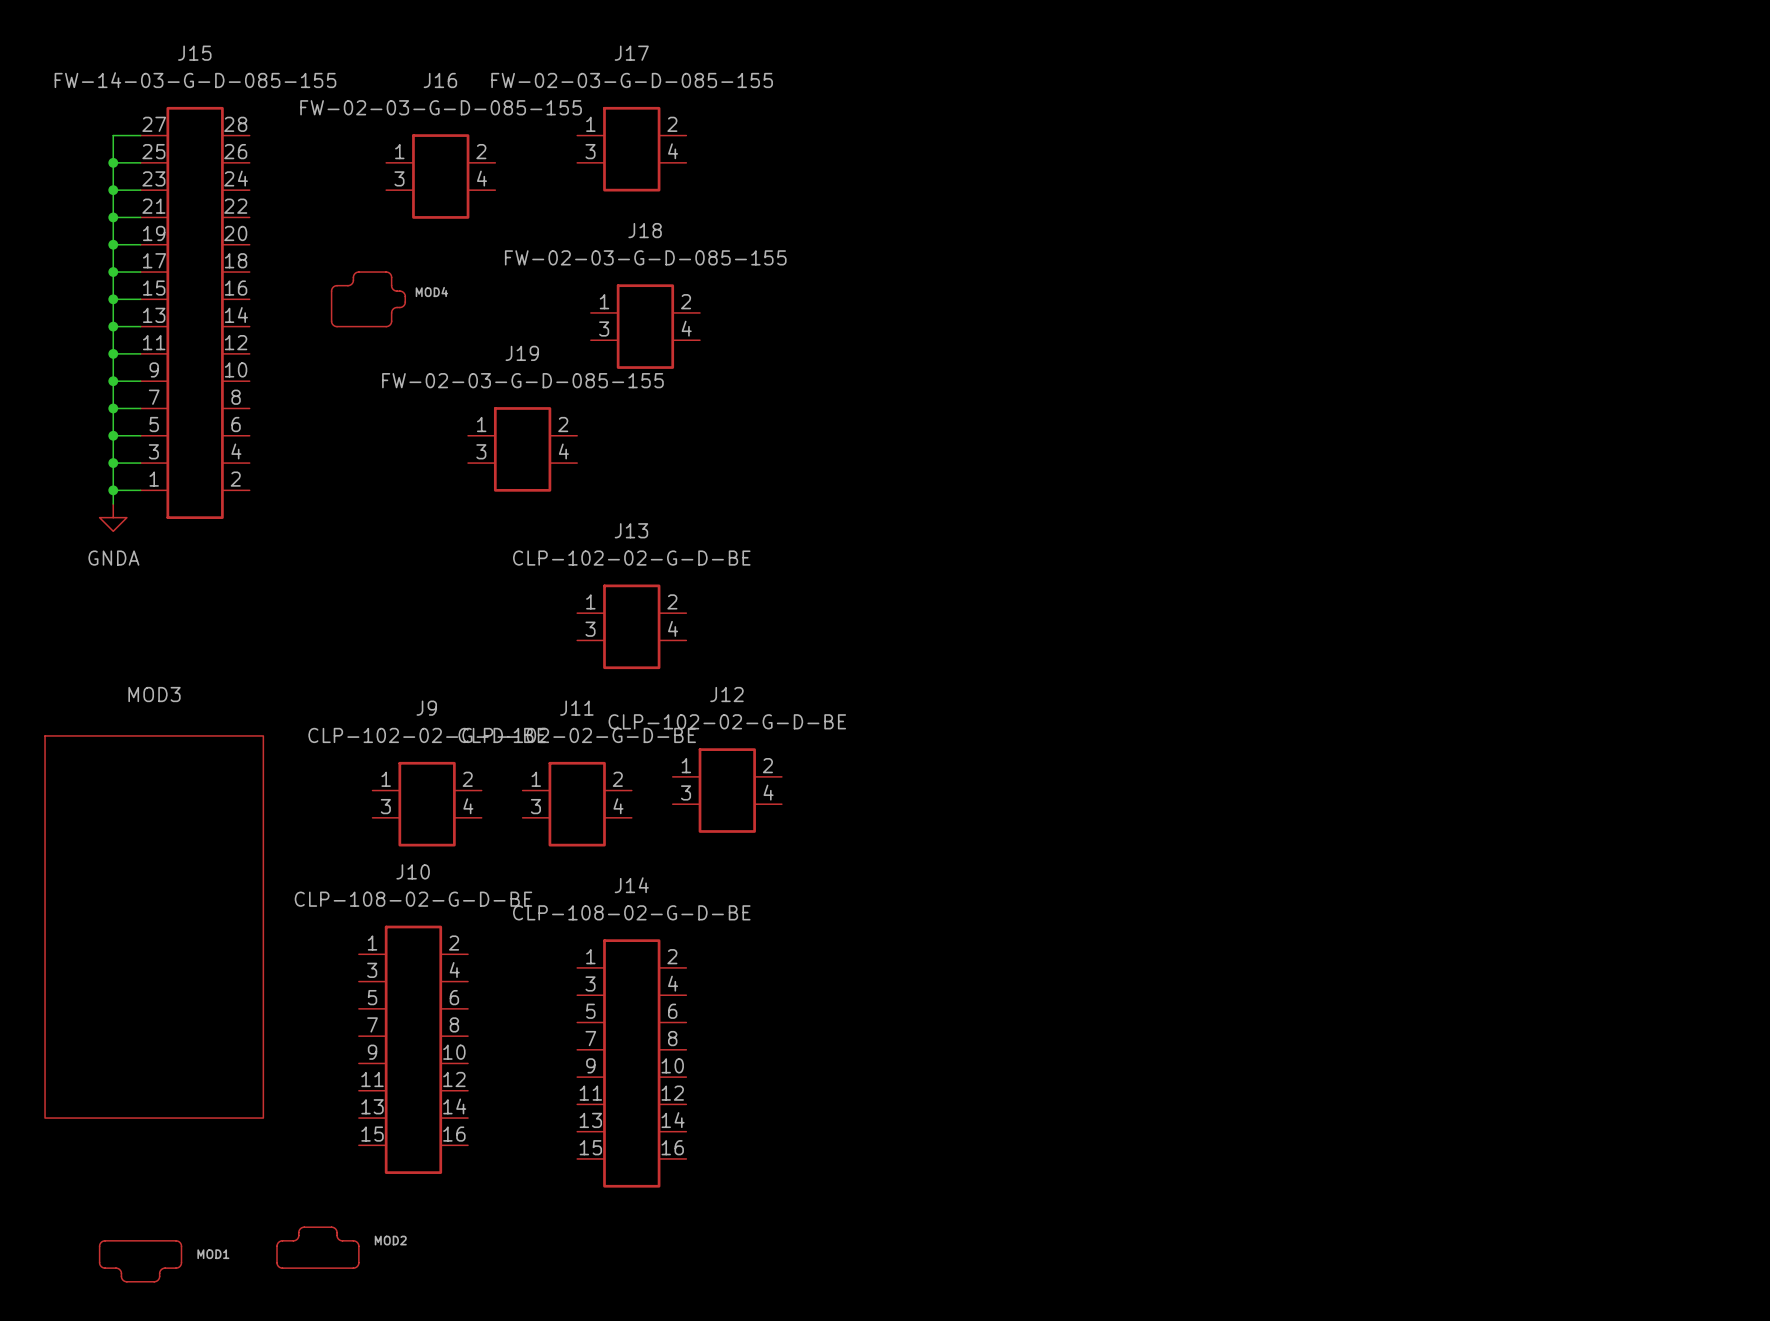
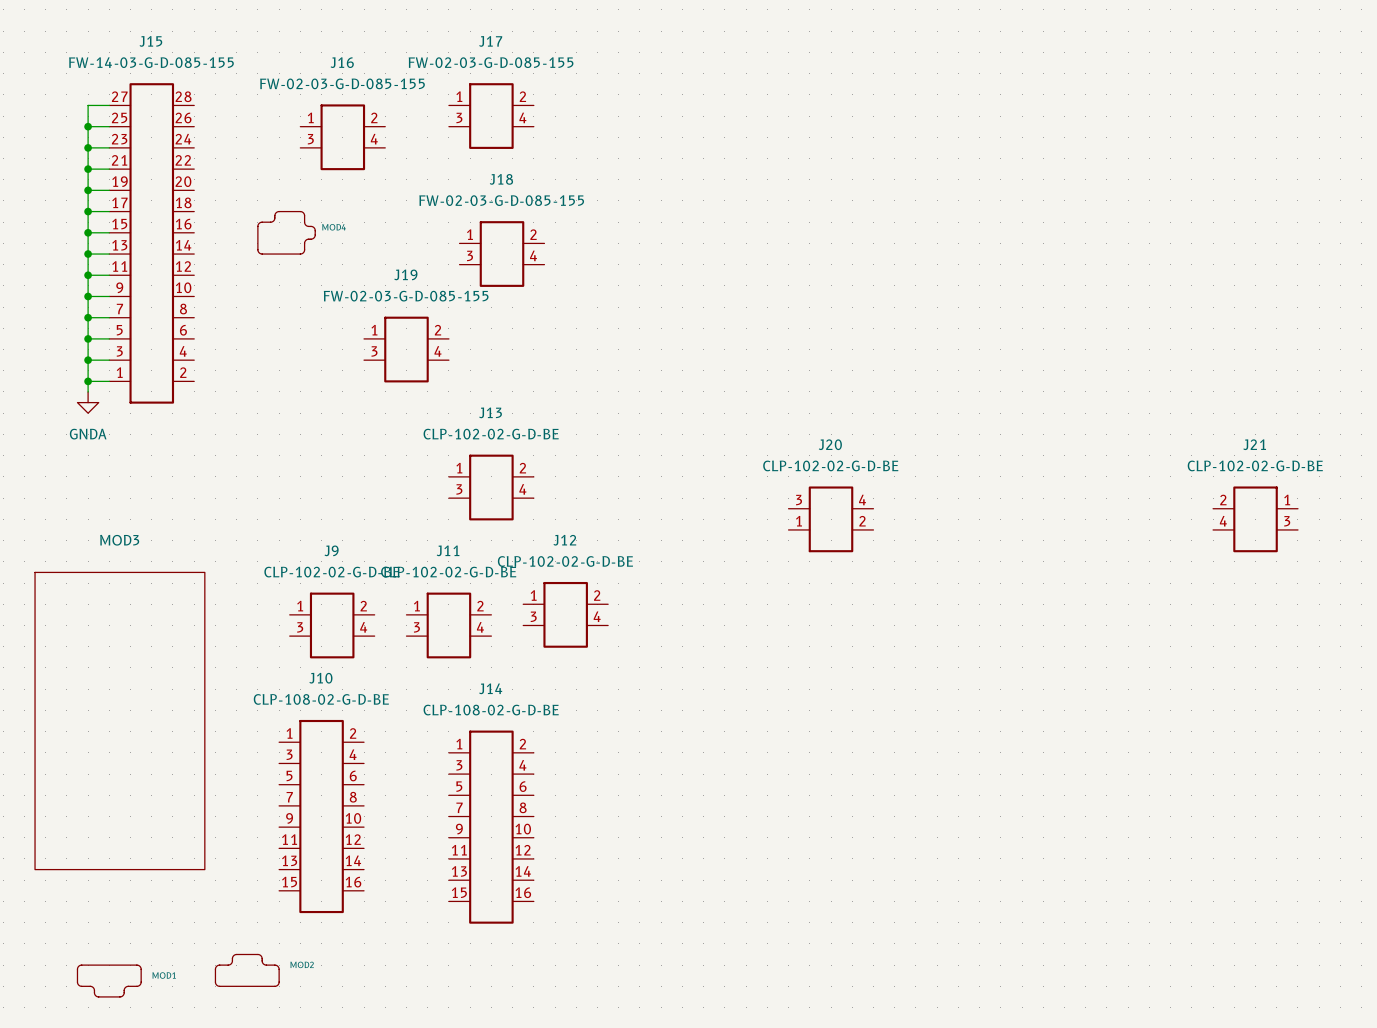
J20: none -> CLP-102-02-G-D-BE (831, 519)
J21: none -> CLP-102-02-G-D-BE (1255, 519)

